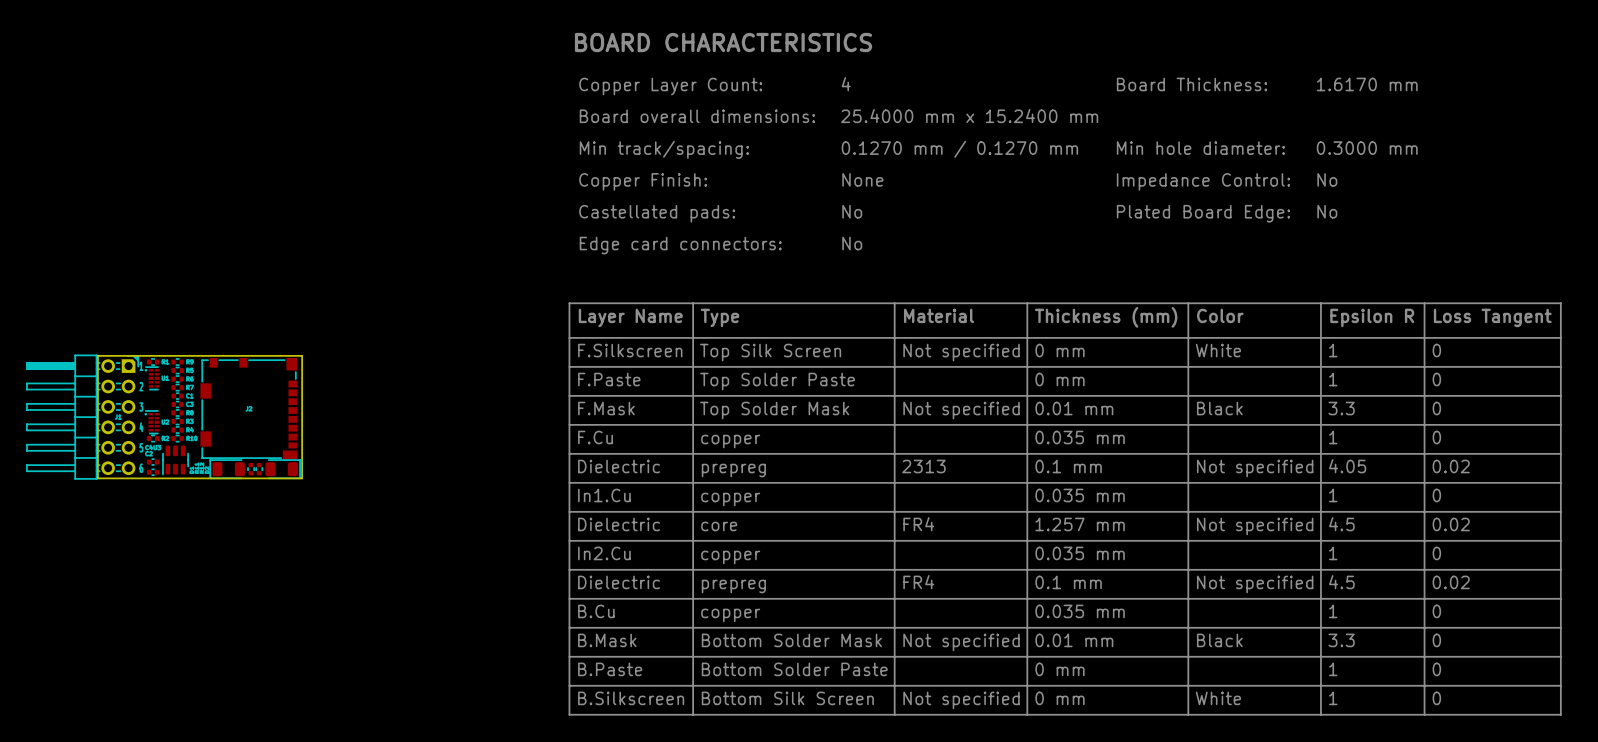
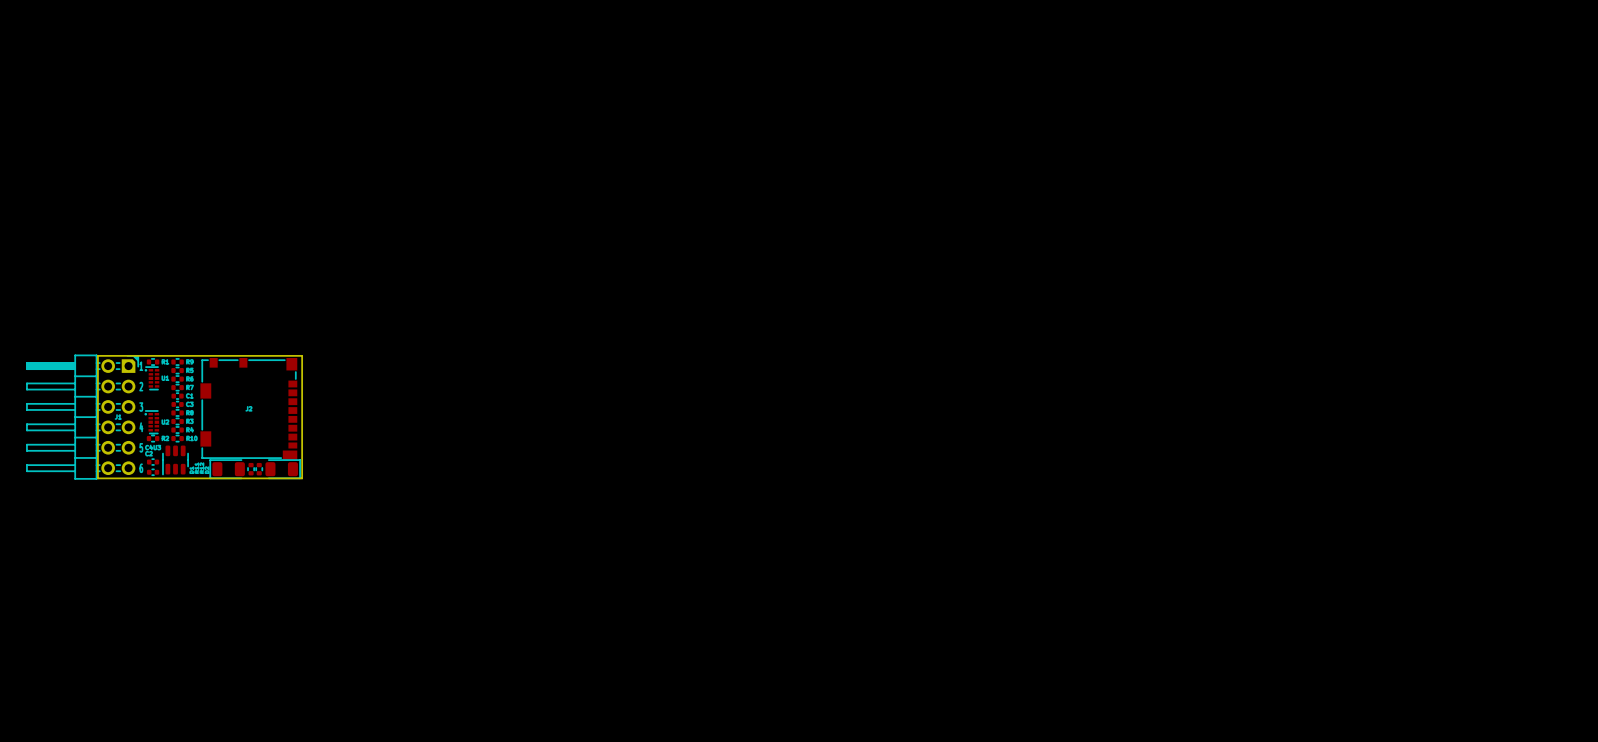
text: BOARD CHARACTERISTICS (723, 42) -> none
text: 4 (846, 84) -> none
text: Board Thickness: (1191, 84) -> none
text: 1.6170 mm (1367, 84) -> none
text: Copper Layer Count: (670, 86) -> none
text: Board overall dimensions: (697, 116) -> none
text: 25.4000 mm x 15.2400 mm (969, 116) -> none
text: Min hole diameter: (1200, 148) -> none
text: 0.3000 mm (1367, 148) -> none
text: Min track/spacing: (664, 149) -> none
text: 0.1270 mm / 0.1270 mm (959, 149) -> none
text: None (862, 179) -> none
text: No (1327, 179) -> none
text: Copper Finish: (643, 181) -> none
text: Impedance Control: (1203, 181) -> none
text: No (852, 211) -> none
text: No (1327, 211) -> none
text: Castellated pads: (657, 213) -> none
text: Plated Board Edge: (1203, 213) -> none
text: No (852, 243) -> none
text: Edge card connectors: (680, 245) -> none
line: (569, 303) (569, 714) (1560, 714) (1560, 303) (569, 303) -> none
line: (693, 303) (693, 714) -> none
line: (894, 303) (894, 714) -> none
line: (1027, 303) (1027, 714) -> none
line: (1188, 303) (1188, 714) -> none
line: (1320, 303) (1320, 714) -> none
line: (1424, 303) (1424, 714) -> none
text: Material (939, 315) -> none
text: Color (1220, 315) -> none
text: Layer Name (630, 317) -> none
text: Type (719, 317) -> none
text: Thickness (mm) (1106, 317) -> none
text: Epsilon R (1372, 317) -> none
text: Loss Tangent (1492, 317) -> none
line: (569, 337) (1560, 337) -> none
text: F.Silkscreen (630, 350) -> none
text: 0 mm (1060, 350) -> none
text: White (1218, 350) -> none
text: 1 (1333, 350) -> none
text: 0 (1436, 350) -> none
text: Top Silk Screen (770, 352) -> none
text: Not specified (961, 352) -> none
line: (569, 366) (1560, 366) -> none
text: F.Paste (609, 379) -> none
text: 0 mm (1060, 379) -> none
text: 1 (1333, 379) -> none
text: 0 (1436, 379) -> none
text: Top Solder Paste (777, 381) -> none
line: (569, 395) (1560, 395) -> none
text: F.Mask (606, 408) -> none
text: 0.01 mm (1074, 408) -> none
text: Black (1219, 408) -> none
text: 3.3 (1341, 408) -> none
text: 0 (1436, 408) -> none
text: Top Solder Mask (774, 410) -> none
text: Not specified (961, 410) -> none
line: (569, 424) (1560, 424) -> none
text: F.Cu (595, 437) -> none
text: 0.035 mm (1080, 437) -> none
text: 1 (1333, 437) -> none
text: 0 (1436, 437) -> none
text: copper (730, 441) -> none
line: (569, 453) (1560, 453) -> none
text: Dielectric (619, 466) -> none
text: 2313 (923, 466) -> none
text: 0.1 mm (1068, 466) -> none
text: 4.05 (1347, 466) -> none
text: 0.02 (1451, 466) -> none
text: Not specified (1255, 468) -> none
text: prepreg (733, 470) -> none
line: (569, 482) (1560, 482) -> none
text: In1.Cu (604, 495) -> none
text: 0.035 mm (1080, 495) -> none
text: 1 (1333, 495) -> none
text: 0 (1436, 495) -> none
text: copper (730, 499) -> none
line: (569, 511) (1560, 511) -> none
text: Dielectric (619, 524) -> none
text: FR4 (918, 524) -> none
text: 1.257 mm (1080, 524) -> none
text: 4.5 (1341, 524) -> none
text: 0.02 (1451, 524) -> none
text: core (719, 526) -> none
text: Not specified (1255, 526) -> none
line: (569, 540) (1560, 540) -> none
text: In2.Cu (604, 553) -> none
text: 0.035 mm (1080, 553) -> none
text: 1 (1333, 553) -> none
text: 0 (1436, 553) -> none
text: copper (730, 557) -> none
line: (569, 569) (1560, 569) -> none
text: Dielectric (619, 582) -> none
text: FR4 (918, 582) -> none
text: 0.1 mm (1068, 582) -> none
text: 4.5 (1341, 582) -> none
text: 0.02 (1451, 582) -> none
text: Not specified (1255, 584) -> none
text: prepreg (733, 586) -> none
line: (569, 598) (1560, 598) -> none
text: B.Cu (596, 611) -> none
text: 0.035 mm (1080, 611) -> none
text: 1 (1333, 611) -> none
text: 0 (1436, 611) -> none
text: copper (730, 615) -> none
line: (569, 627) (1560, 627) -> none
text: B.Mask (607, 640) -> none
text: Bottom Solder Mask (791, 640) -> none
text: 0.01 mm (1074, 640) -> none
text: Black (1219, 640) -> none
text: 3.3 (1341, 640) -> none
text: 0 (1436, 640) -> none
text: Not specified (961, 642) -> none
line: (569, 656) (1560, 656) -> none
text: B.Paste (610, 669) -> none
text: Bottom Solder Paste (794, 669) -> none
text: 0 mm (1060, 669) -> none
text: 1 (1333, 669) -> none
text: 0 (1436, 669) -> none
line: (569, 685) (1560, 685) -> none
text: B.Silkscreen (631, 698) -> none
text: Bottom Silk Screen (787, 698) -> none
text: 0 mm (1060, 698) -> none
text: White (1218, 698) -> none
text: 1 (1333, 698) -> none
text: 0 (1436, 698) -> none
text: Not specified (961, 700) -> none

